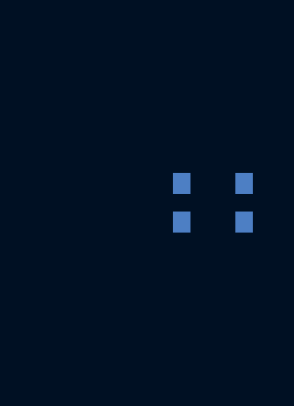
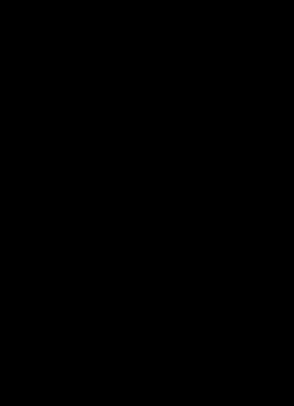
part: (181, 202) -> none
part: (244, 202) -> none

